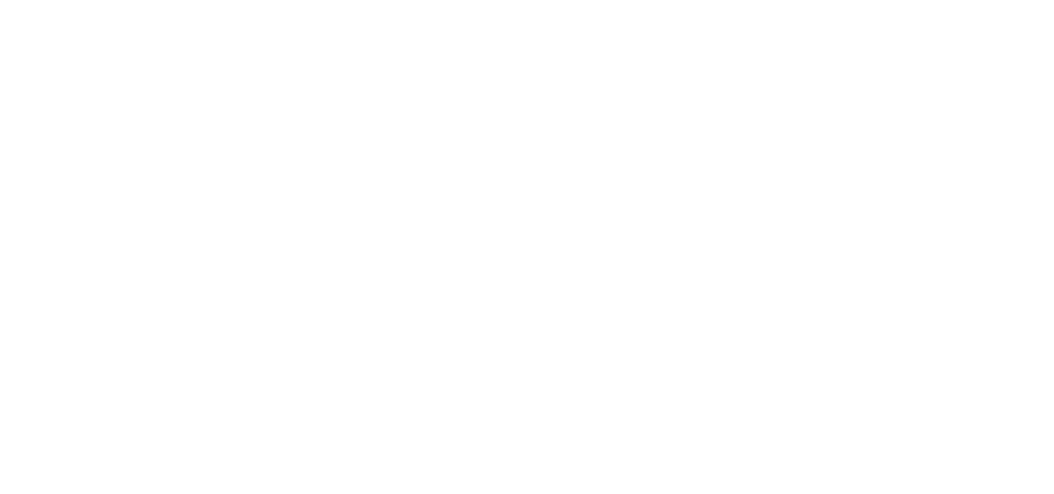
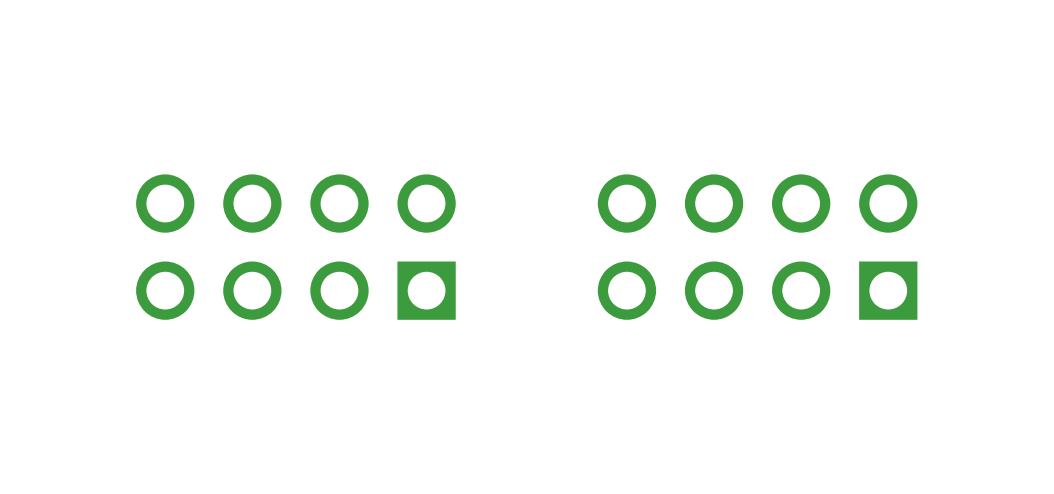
part: none -> (295, 247)
part: none -> (757, 247)

